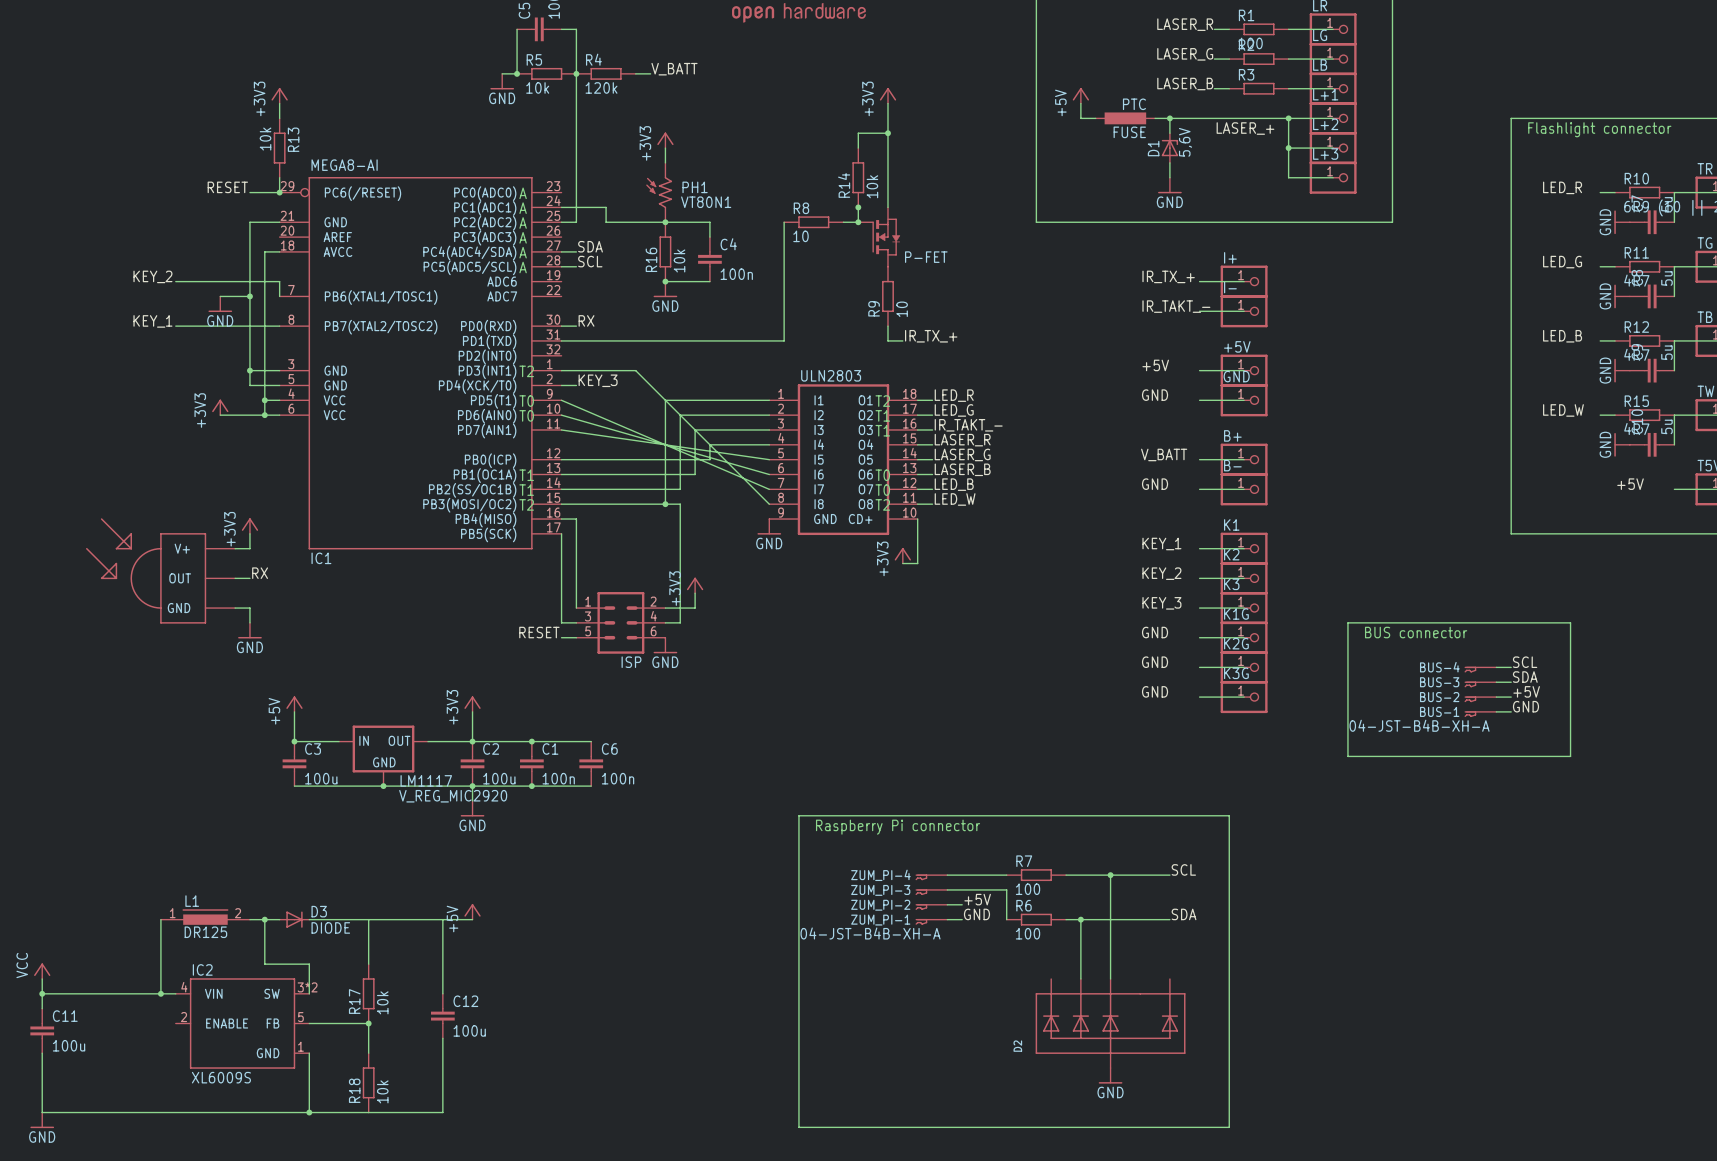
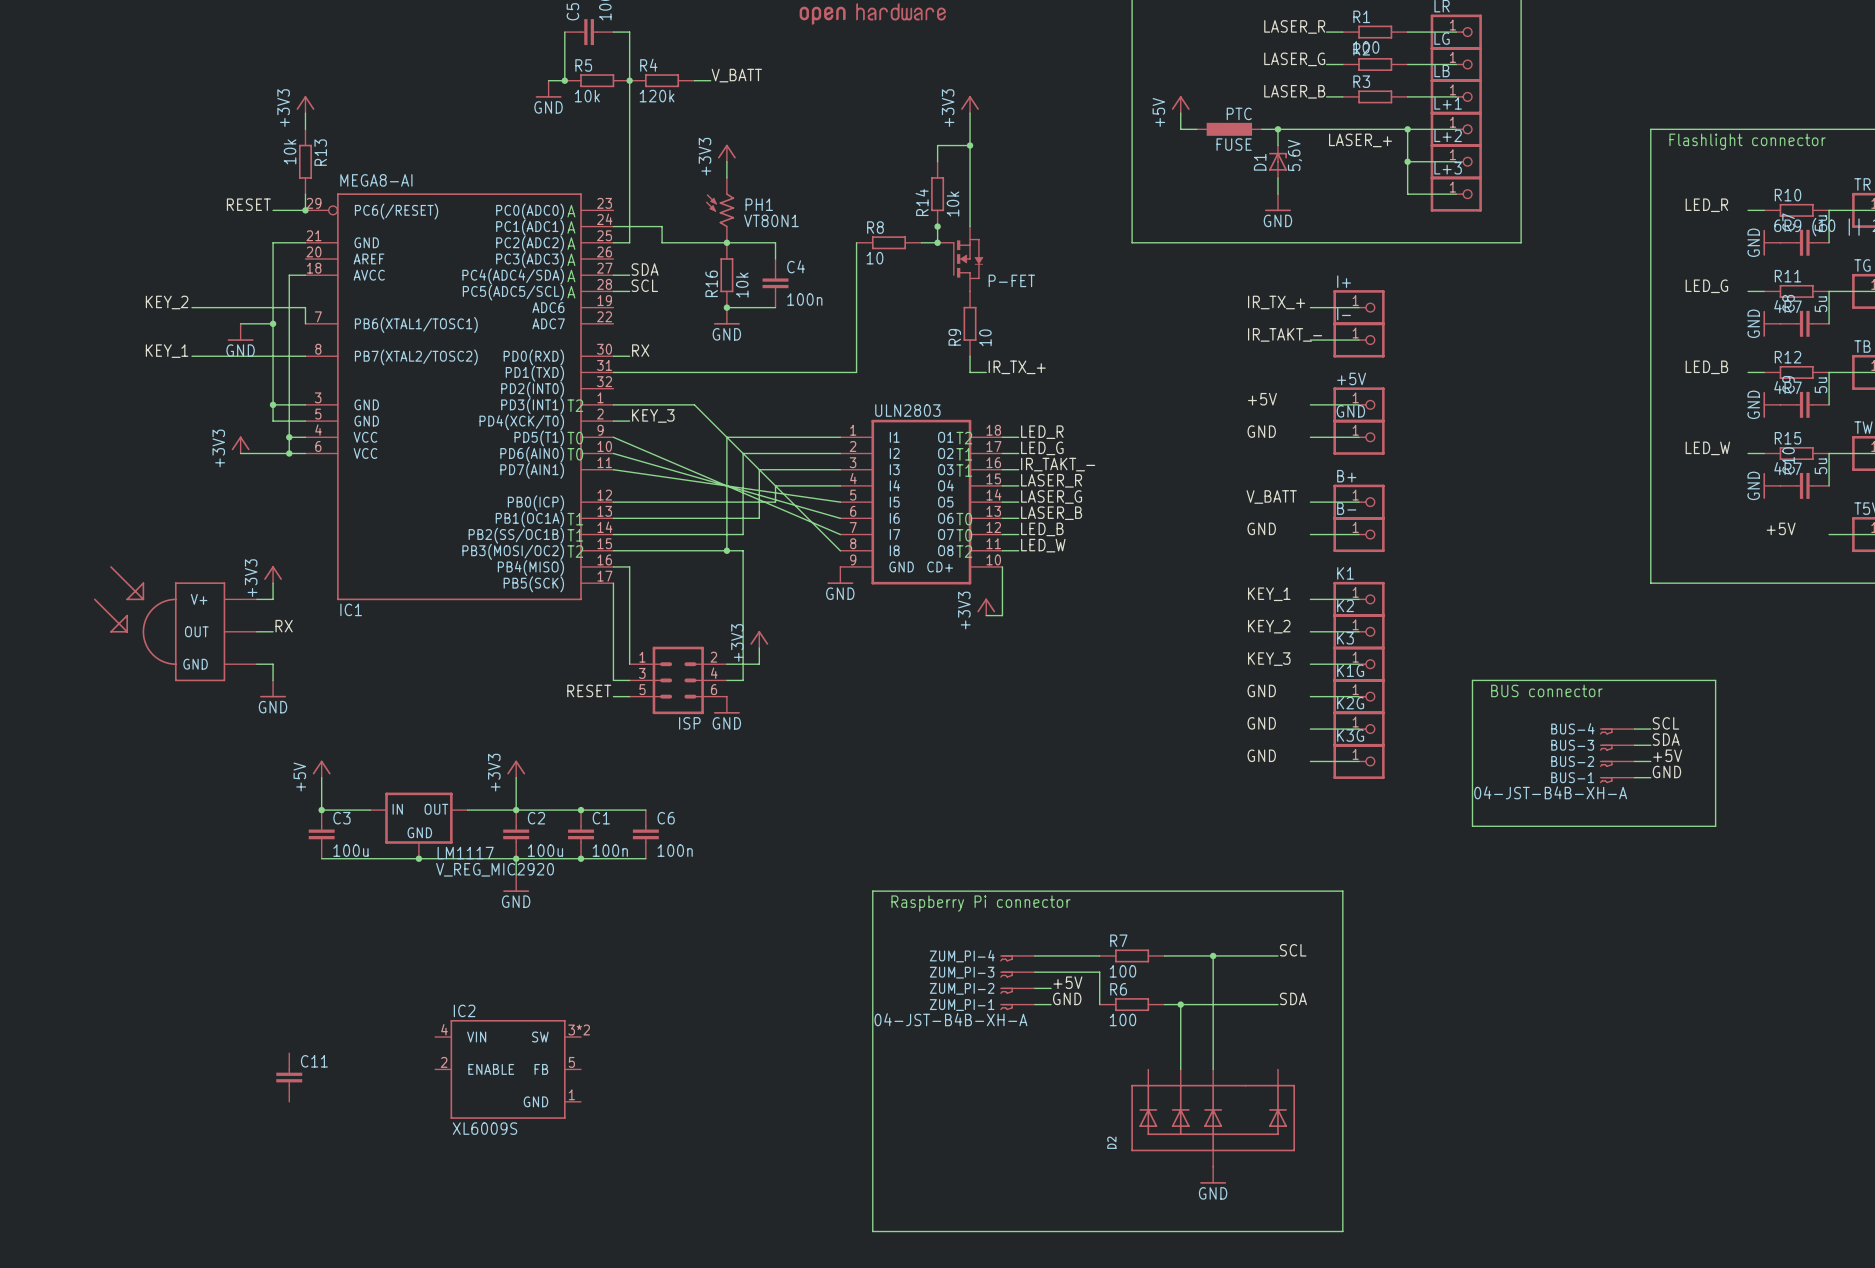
power symbol: +5V (472, 911) -> none
L1: DR125 (205, 917) -> none
wire: (160, 919) (160, 993) -> none
wire: (249, 919) (279, 919) -> none
wire: (264, 919) (264, 964) (309, 964) (309, 993) -> none
junction: (264, 919) -> none
D3: DIODE (294, 919) -> none
wire: (309, 919) (472, 919) -> none
wire: (368, 919) (368, 964) -> none
wire: (442, 919) (442, 993) -> none
power symbol: VCC (42, 971) -> none
wire: (42, 978) (42, 1008) -> none
wire: (42, 993) (175, 993) -> none
junction: (42, 993) -> none
junction: (160, 993) -> none
R17: 10k (368, 993) -> none
C12: 100u (442, 1016) -> none
IC2 position: (242, 1023) -> (508, 1069)
wire: (309, 1023) (368, 1023) (368, 1053) -> none
junction: (368, 1023) -> none
C11 position: (42, 1030) -> (289, 1077)
wire: (442, 1038) (442, 1112) (42, 1112) (42, 1053) -> none
C11 value: 100u (69, 1045) -> none
wire: (309, 1053) (309, 1112) -> none
R18: 10k (368, 1082) -> none
junction: (309, 1112) -> none
power symbol: GND (42, 1120) -> none

